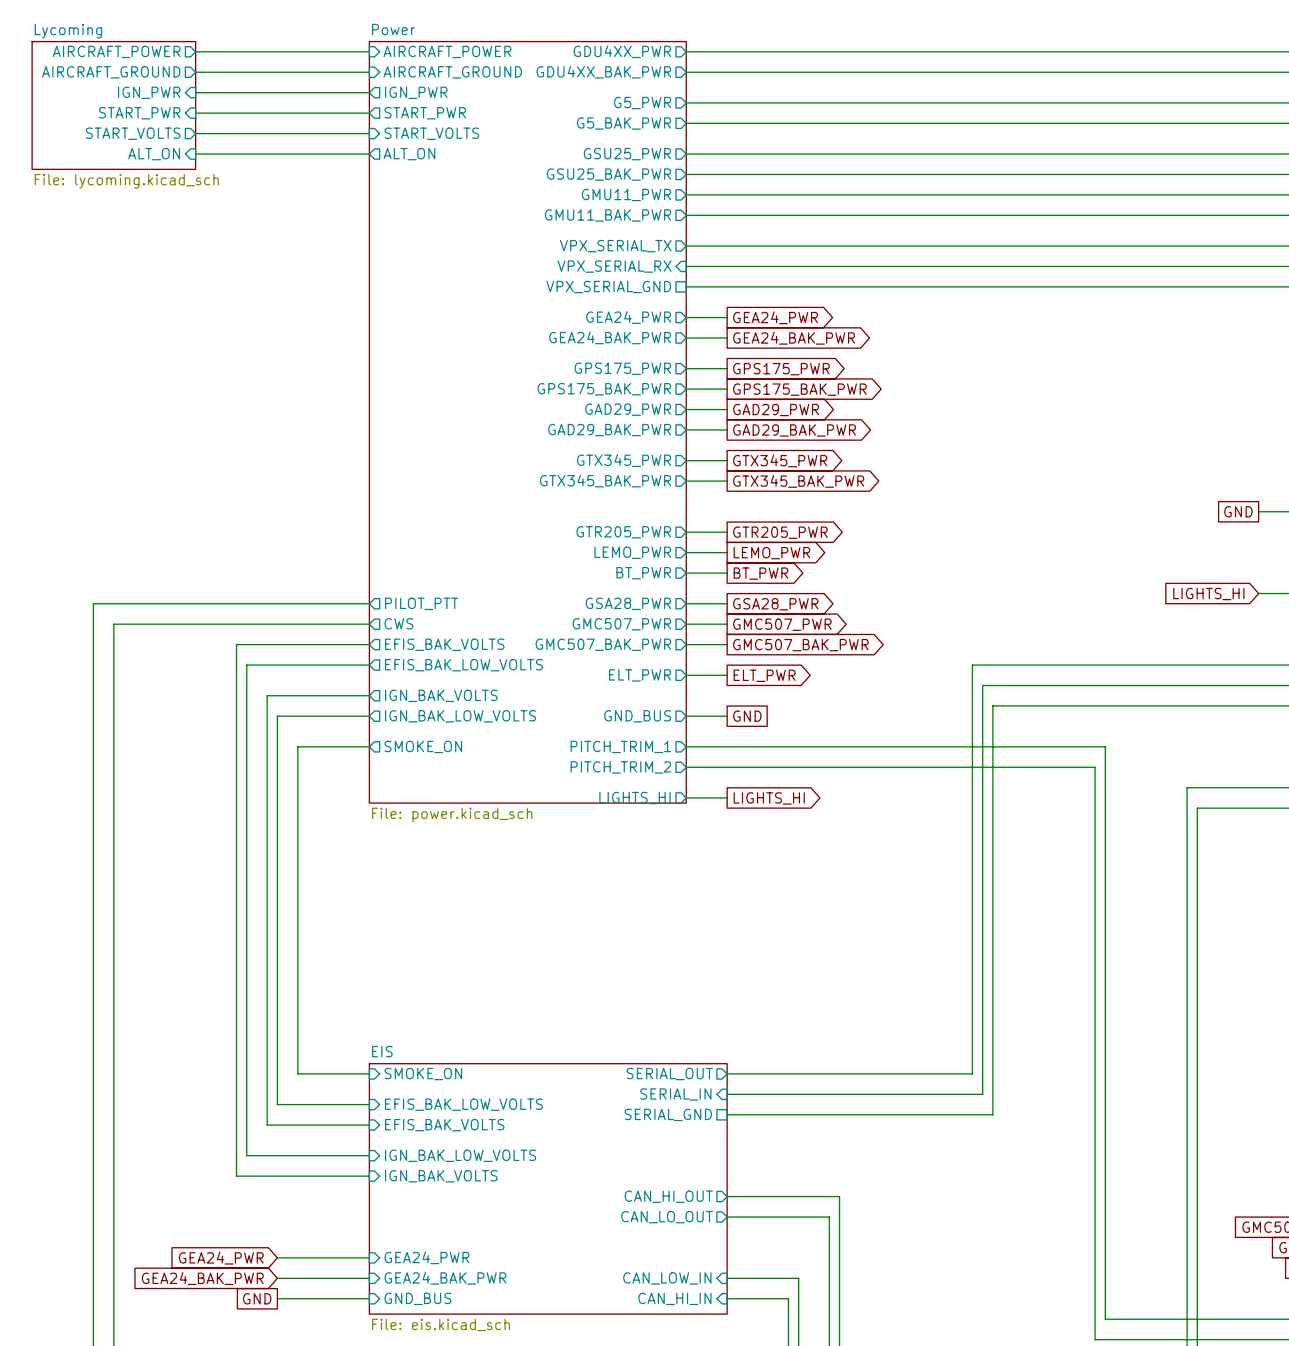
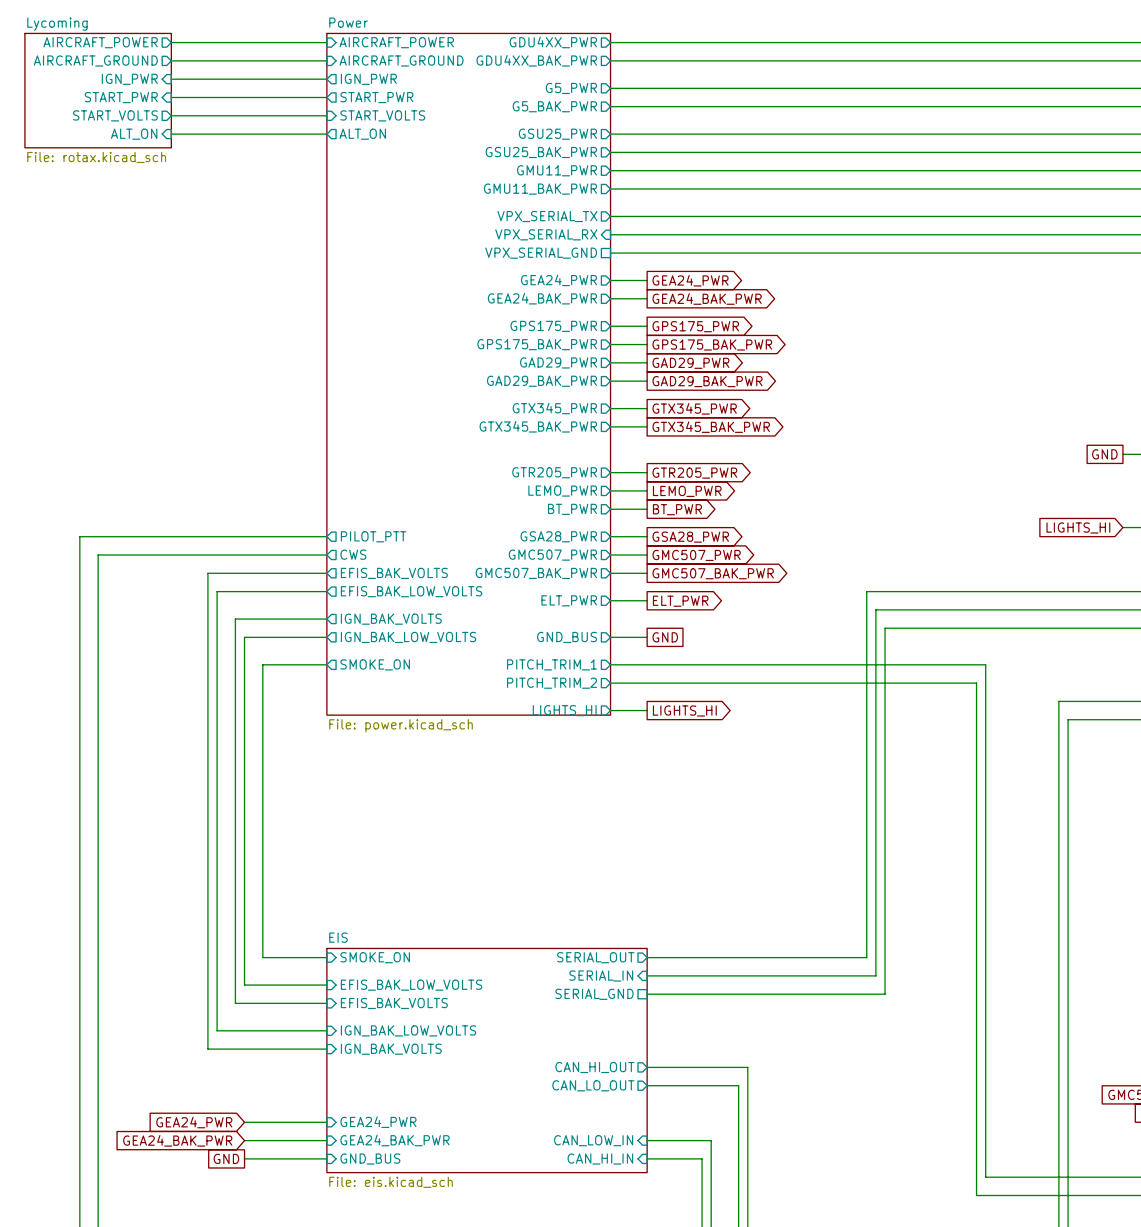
sheet Lycoming value: File: lycoming.kicad_sch (126, 181) -> File: rotax.kicad_sch (96, 157)

